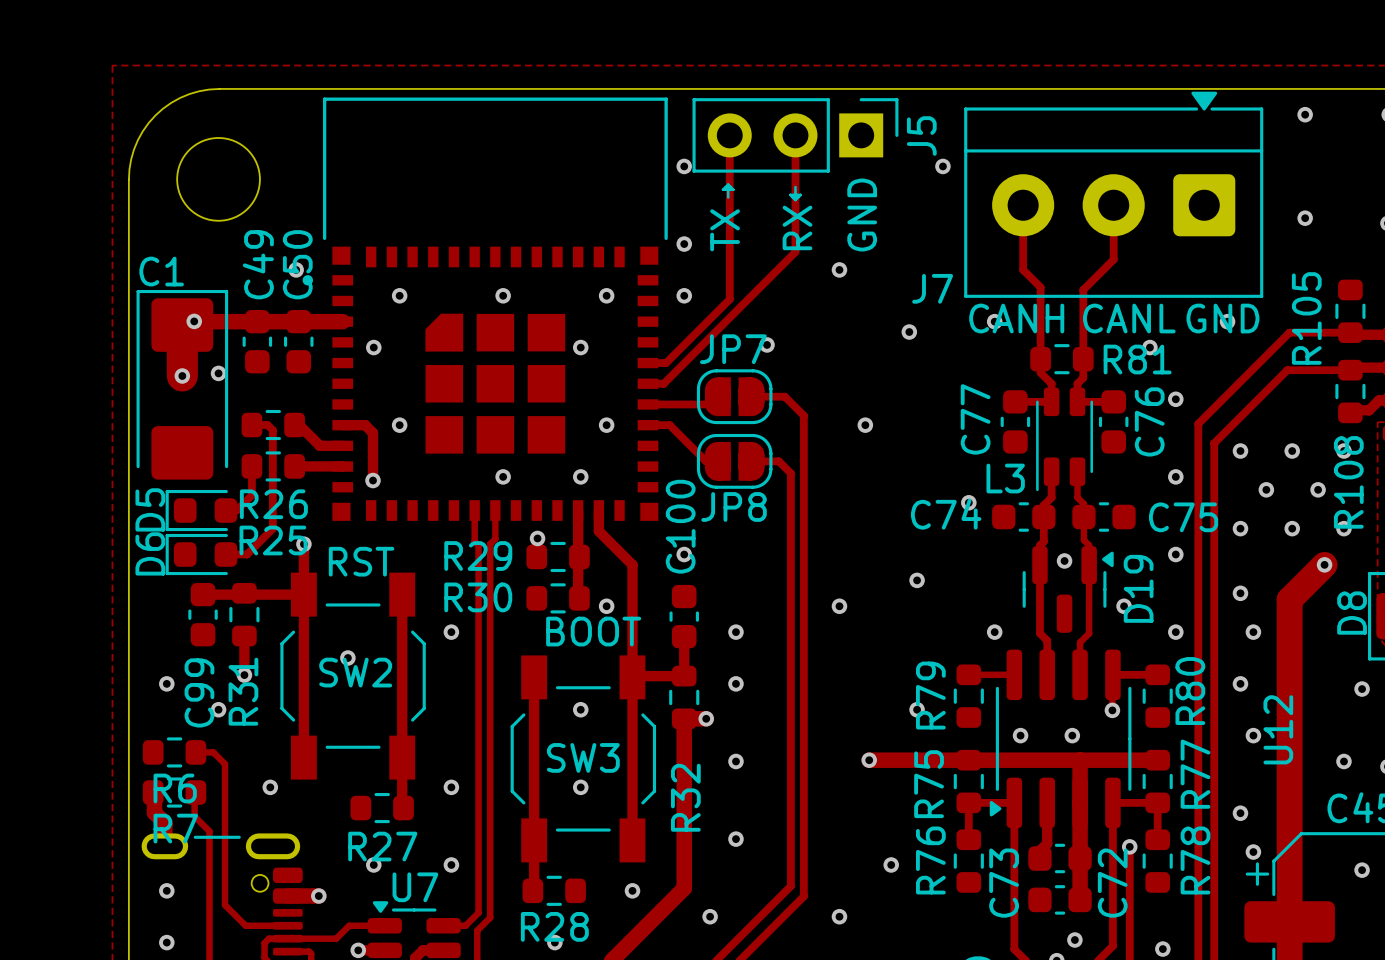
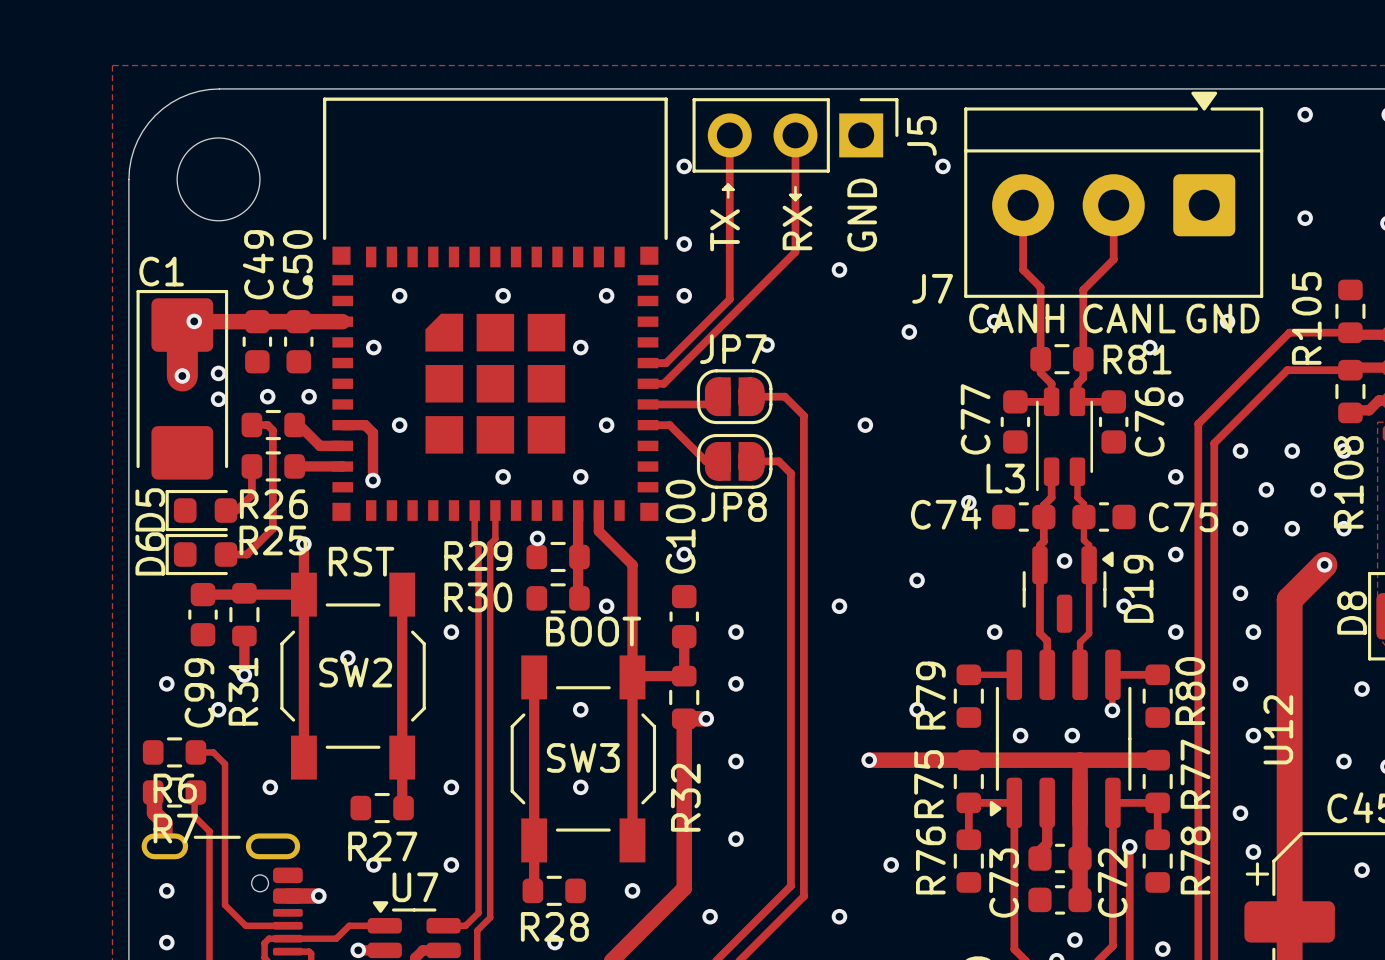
via: (296, 269) -> none
via: none -> (267, 396)
via: none -> (309, 396)
via: none -> (218, 399)

